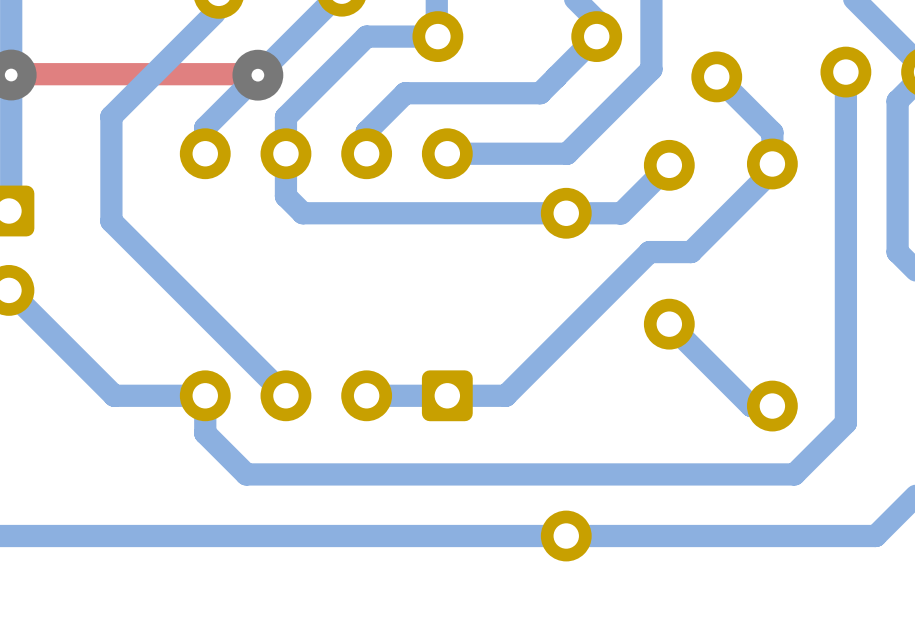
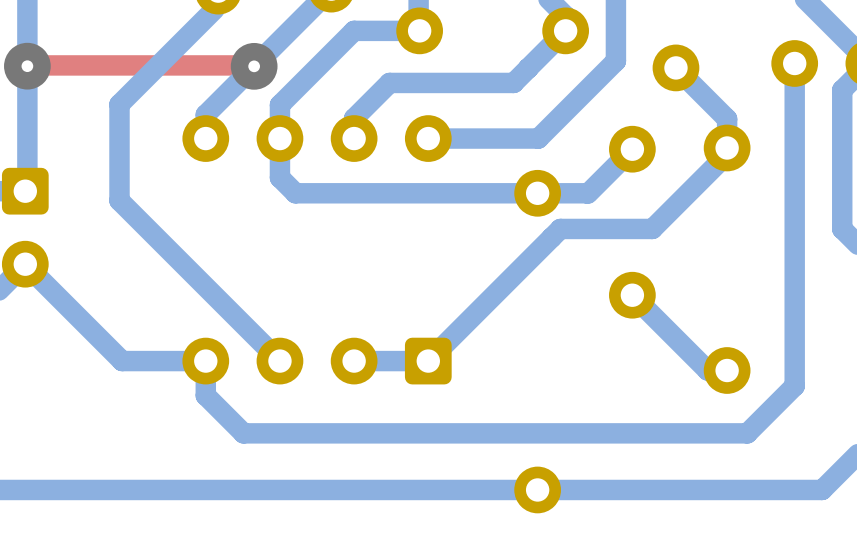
bottom track: (649, 252) (505, 395) (447, 395) -> (614, 228) (560, 228) (428, 361)

